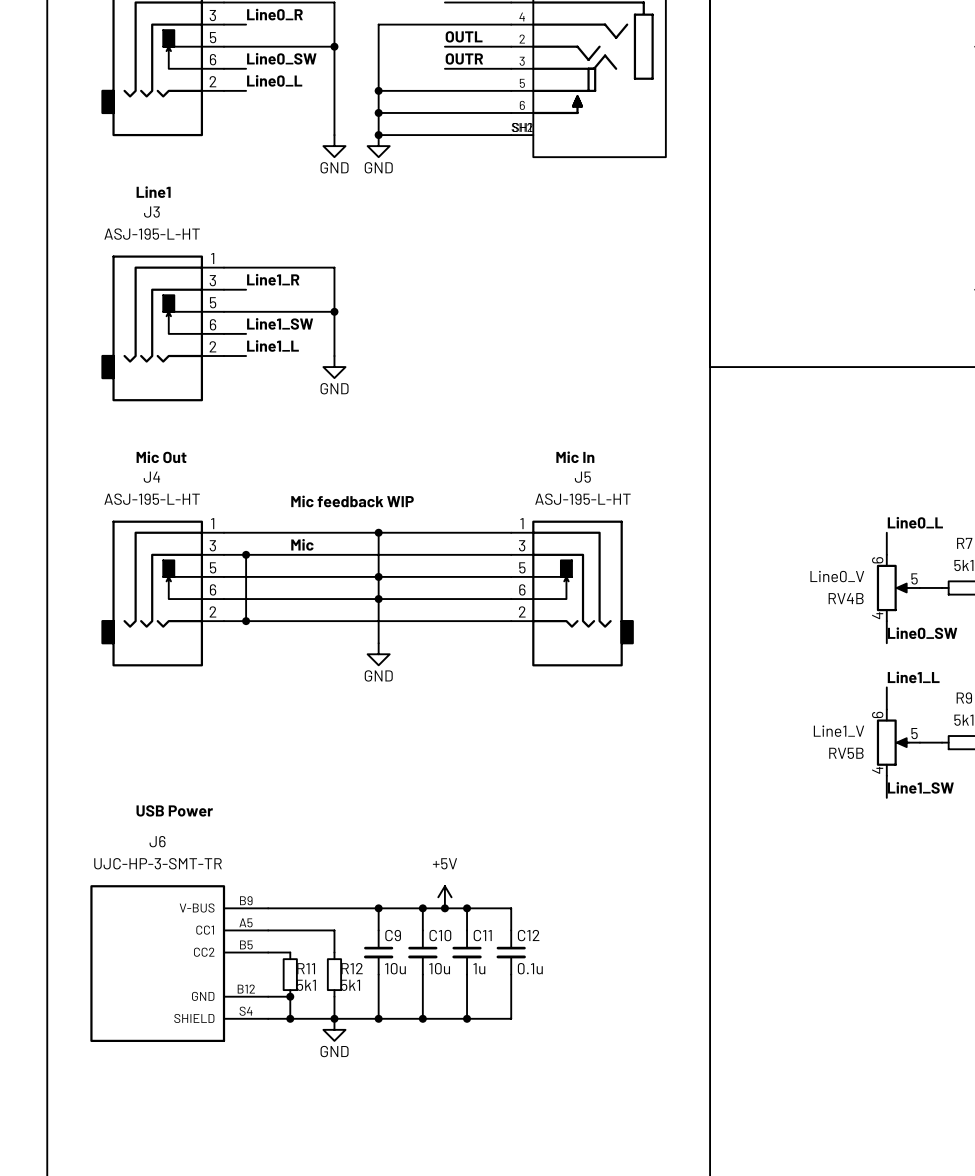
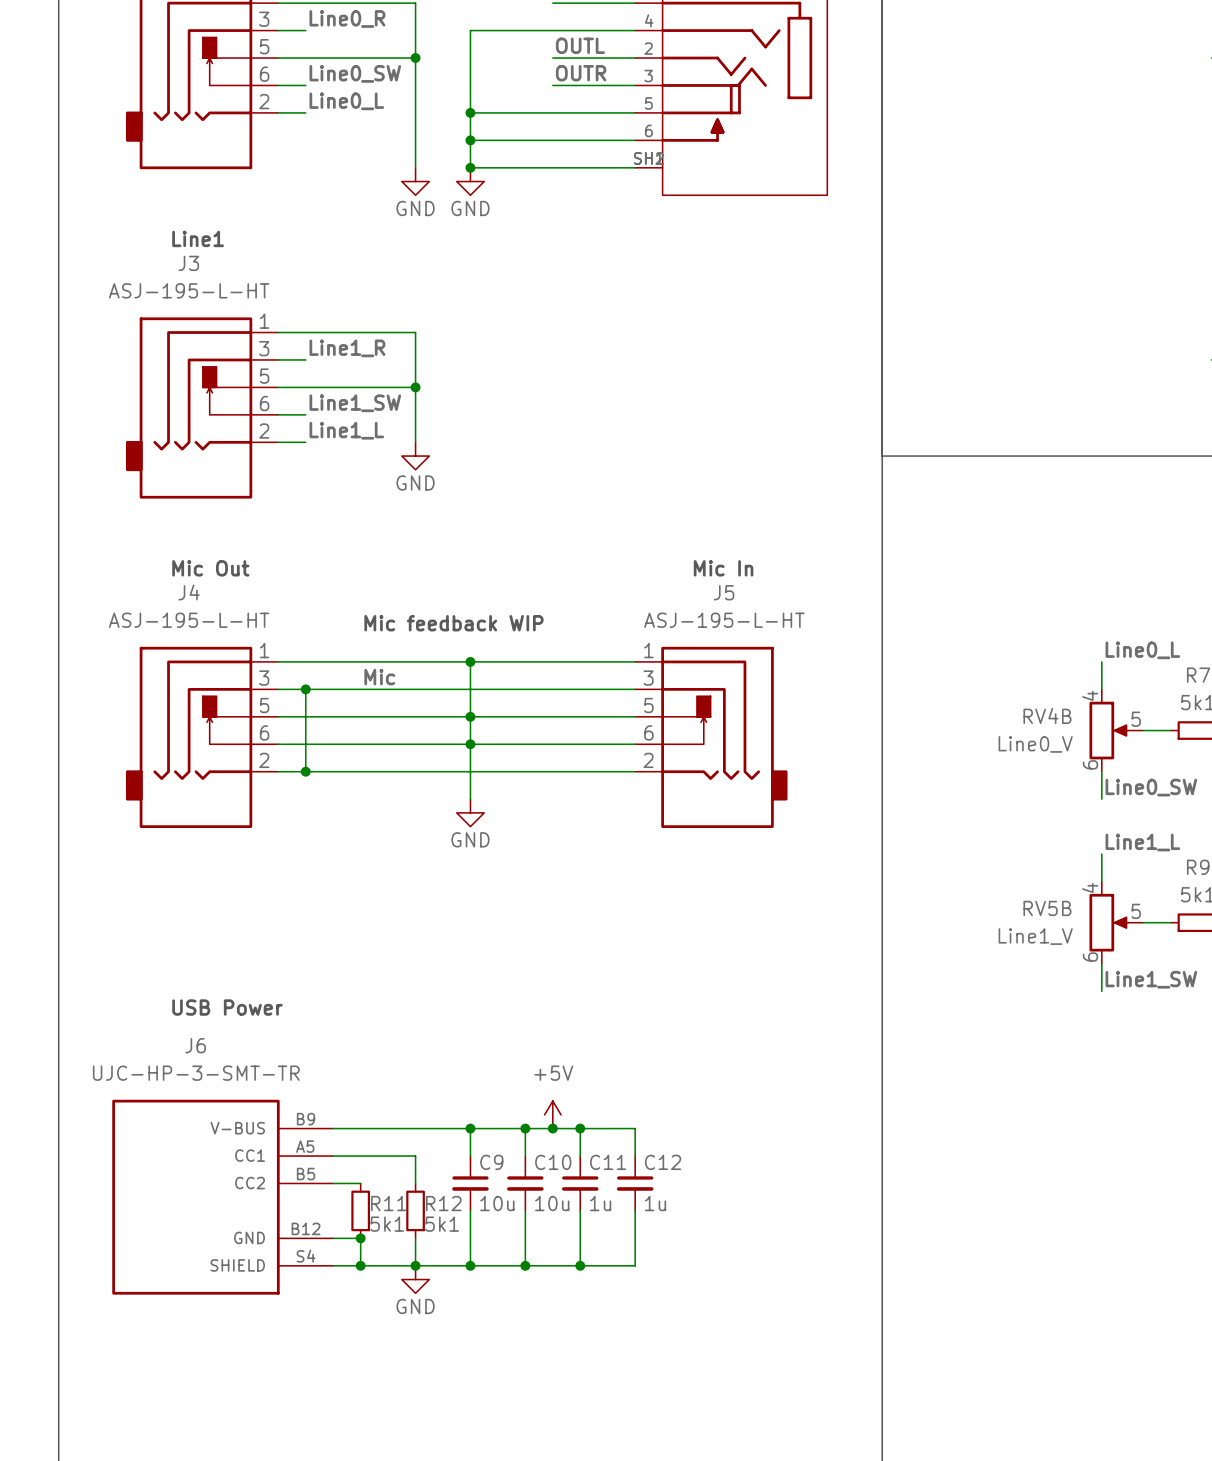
RV4B flip: as is (892, 587) -> up-down (1109, 730)
RV5B flip: as is (892, 742) -> up-down (1109, 922)
C12 value: 0.1u (530, 968) -> 1u (655, 1203)

